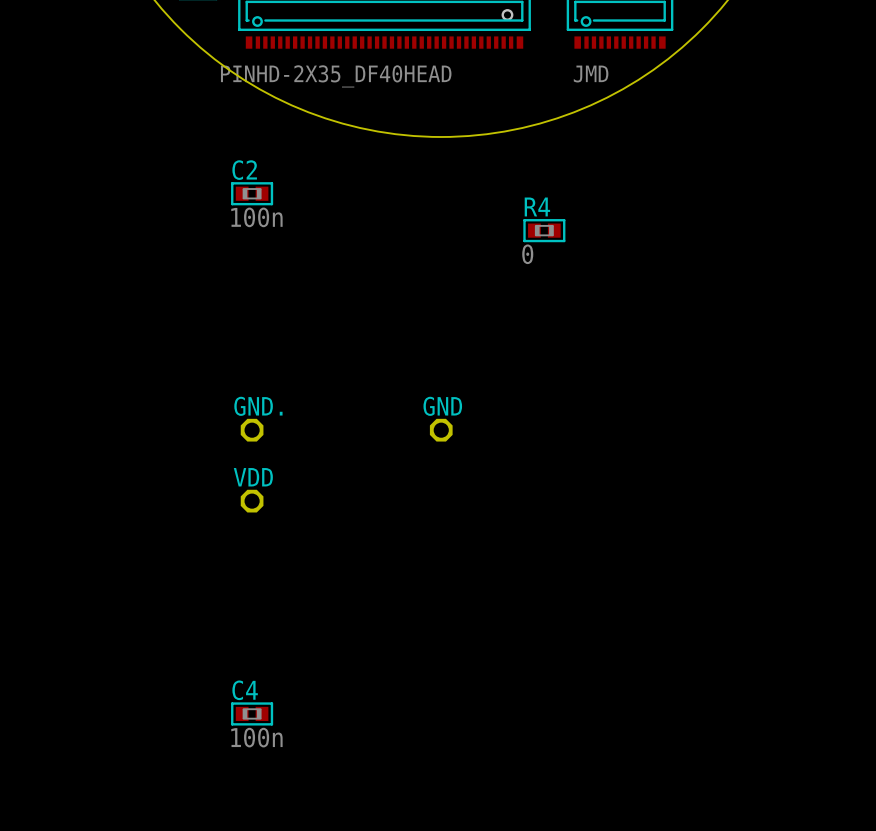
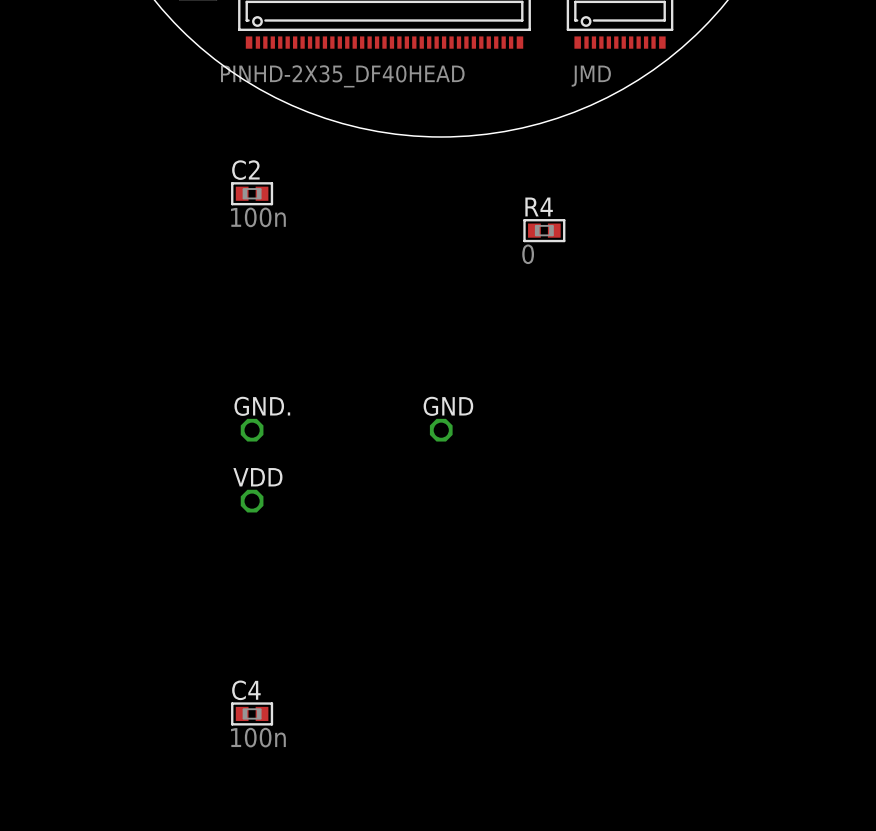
via: (507, 14) -> none

